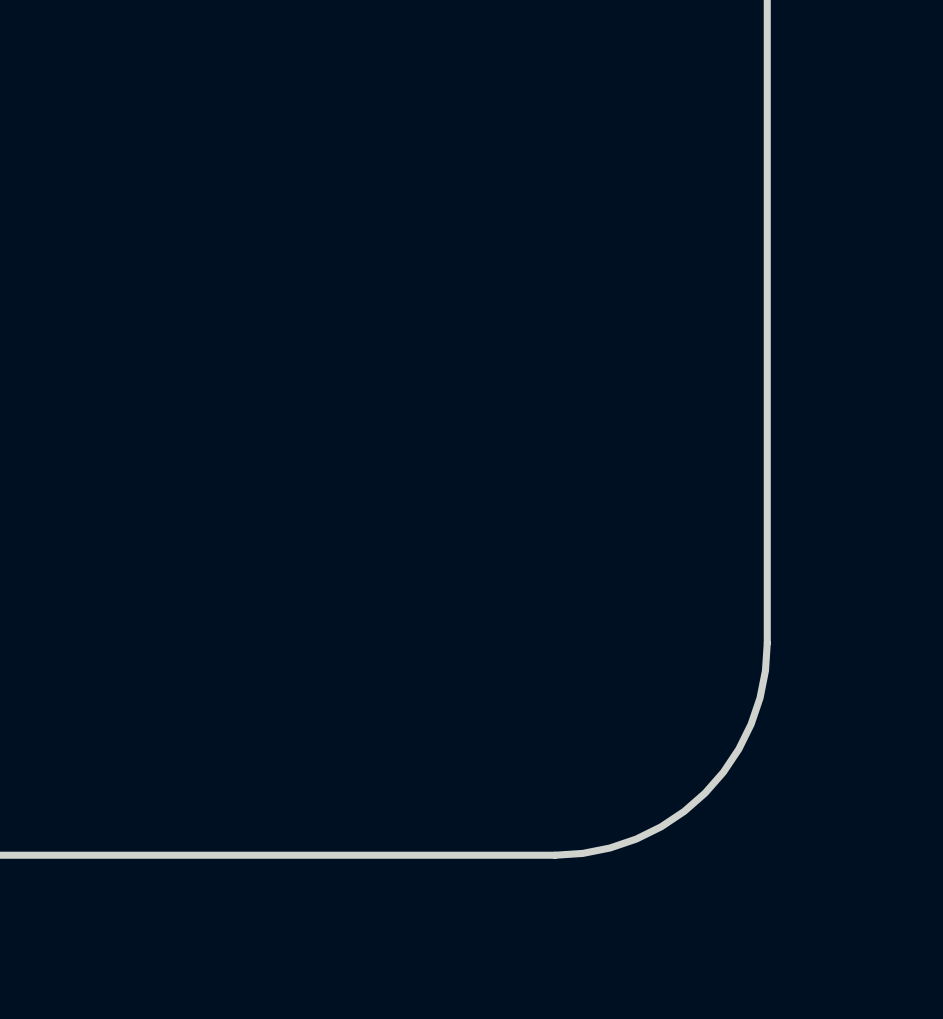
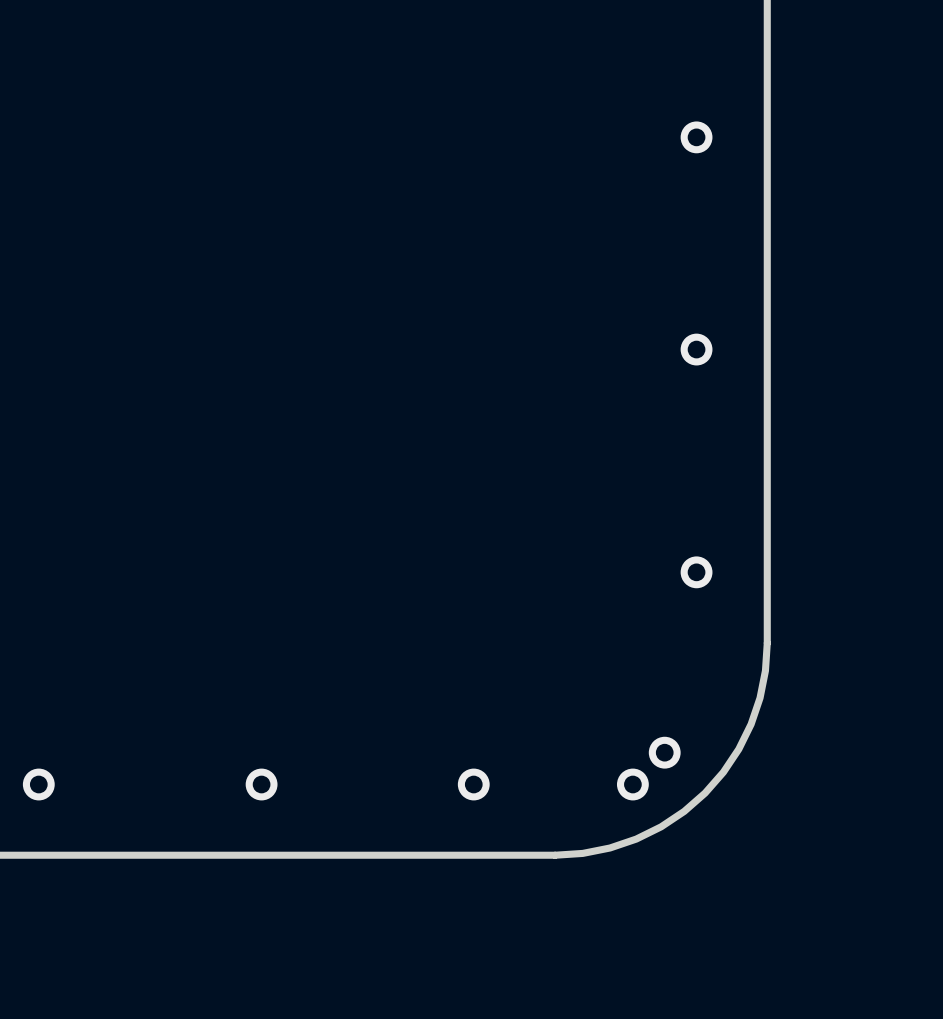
via: none -> (696, 137)
via: none -> (696, 349)
via: none -> (696, 572)
via: none -> (664, 752)
via: none -> (38, 784)
via: none -> (261, 784)
via: none -> (473, 784)
via: none -> (632, 784)

